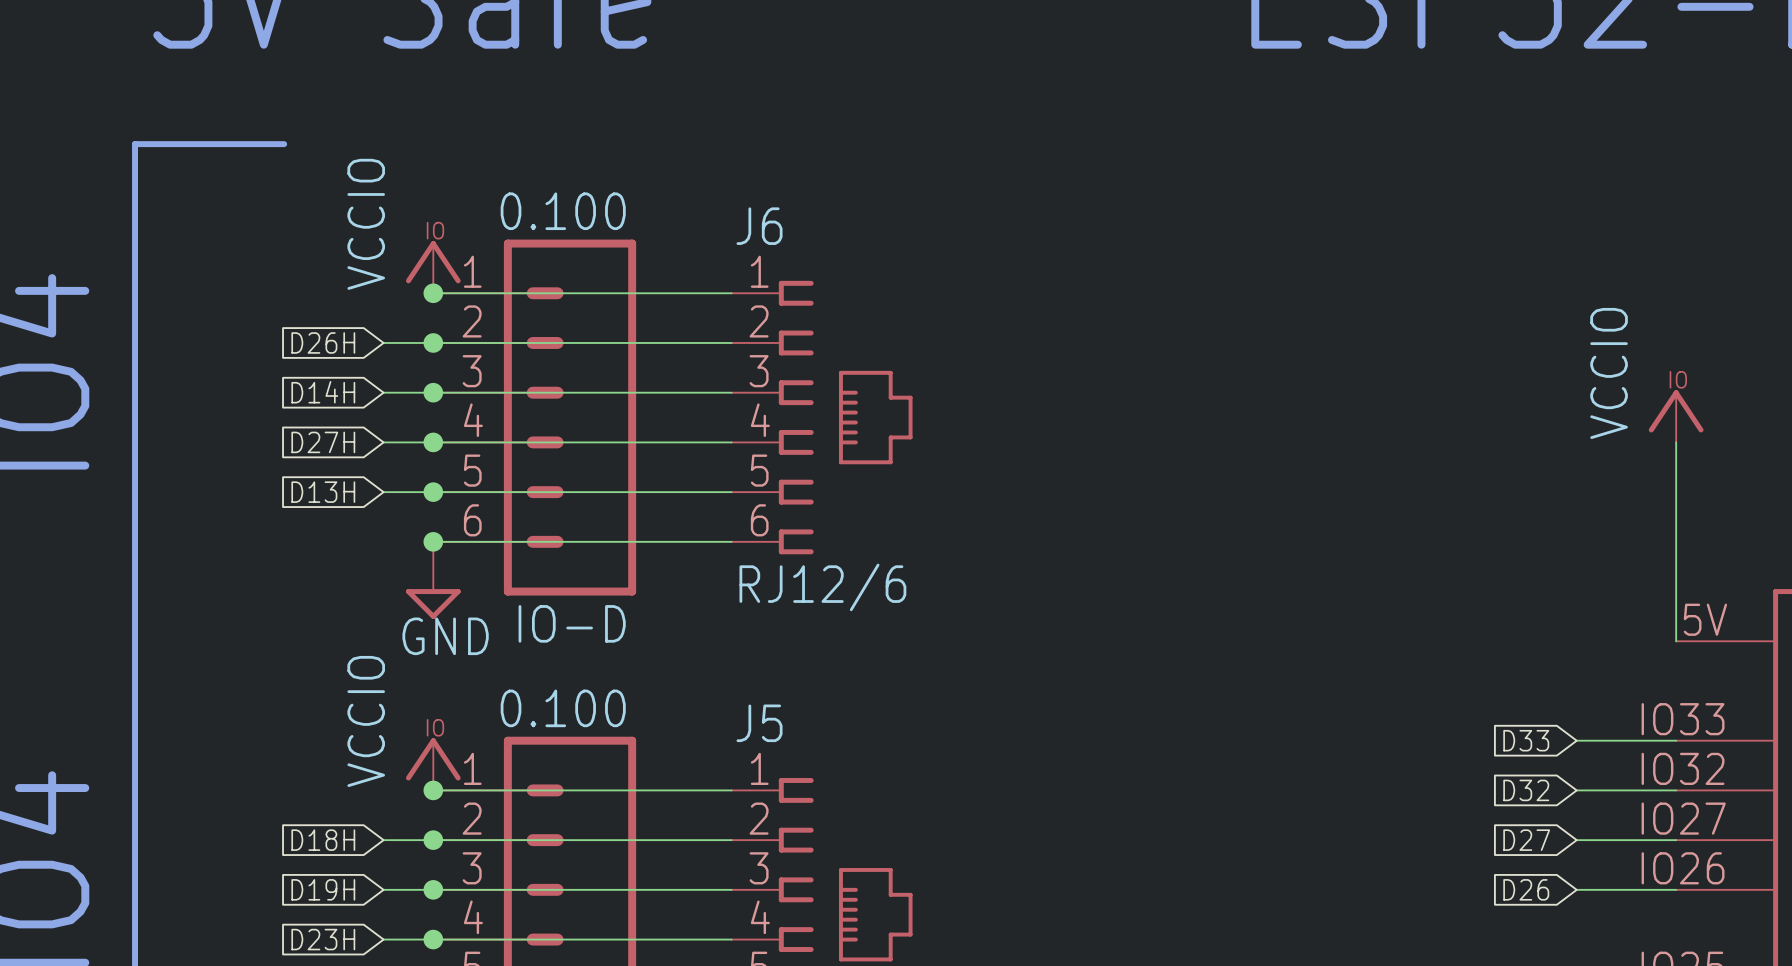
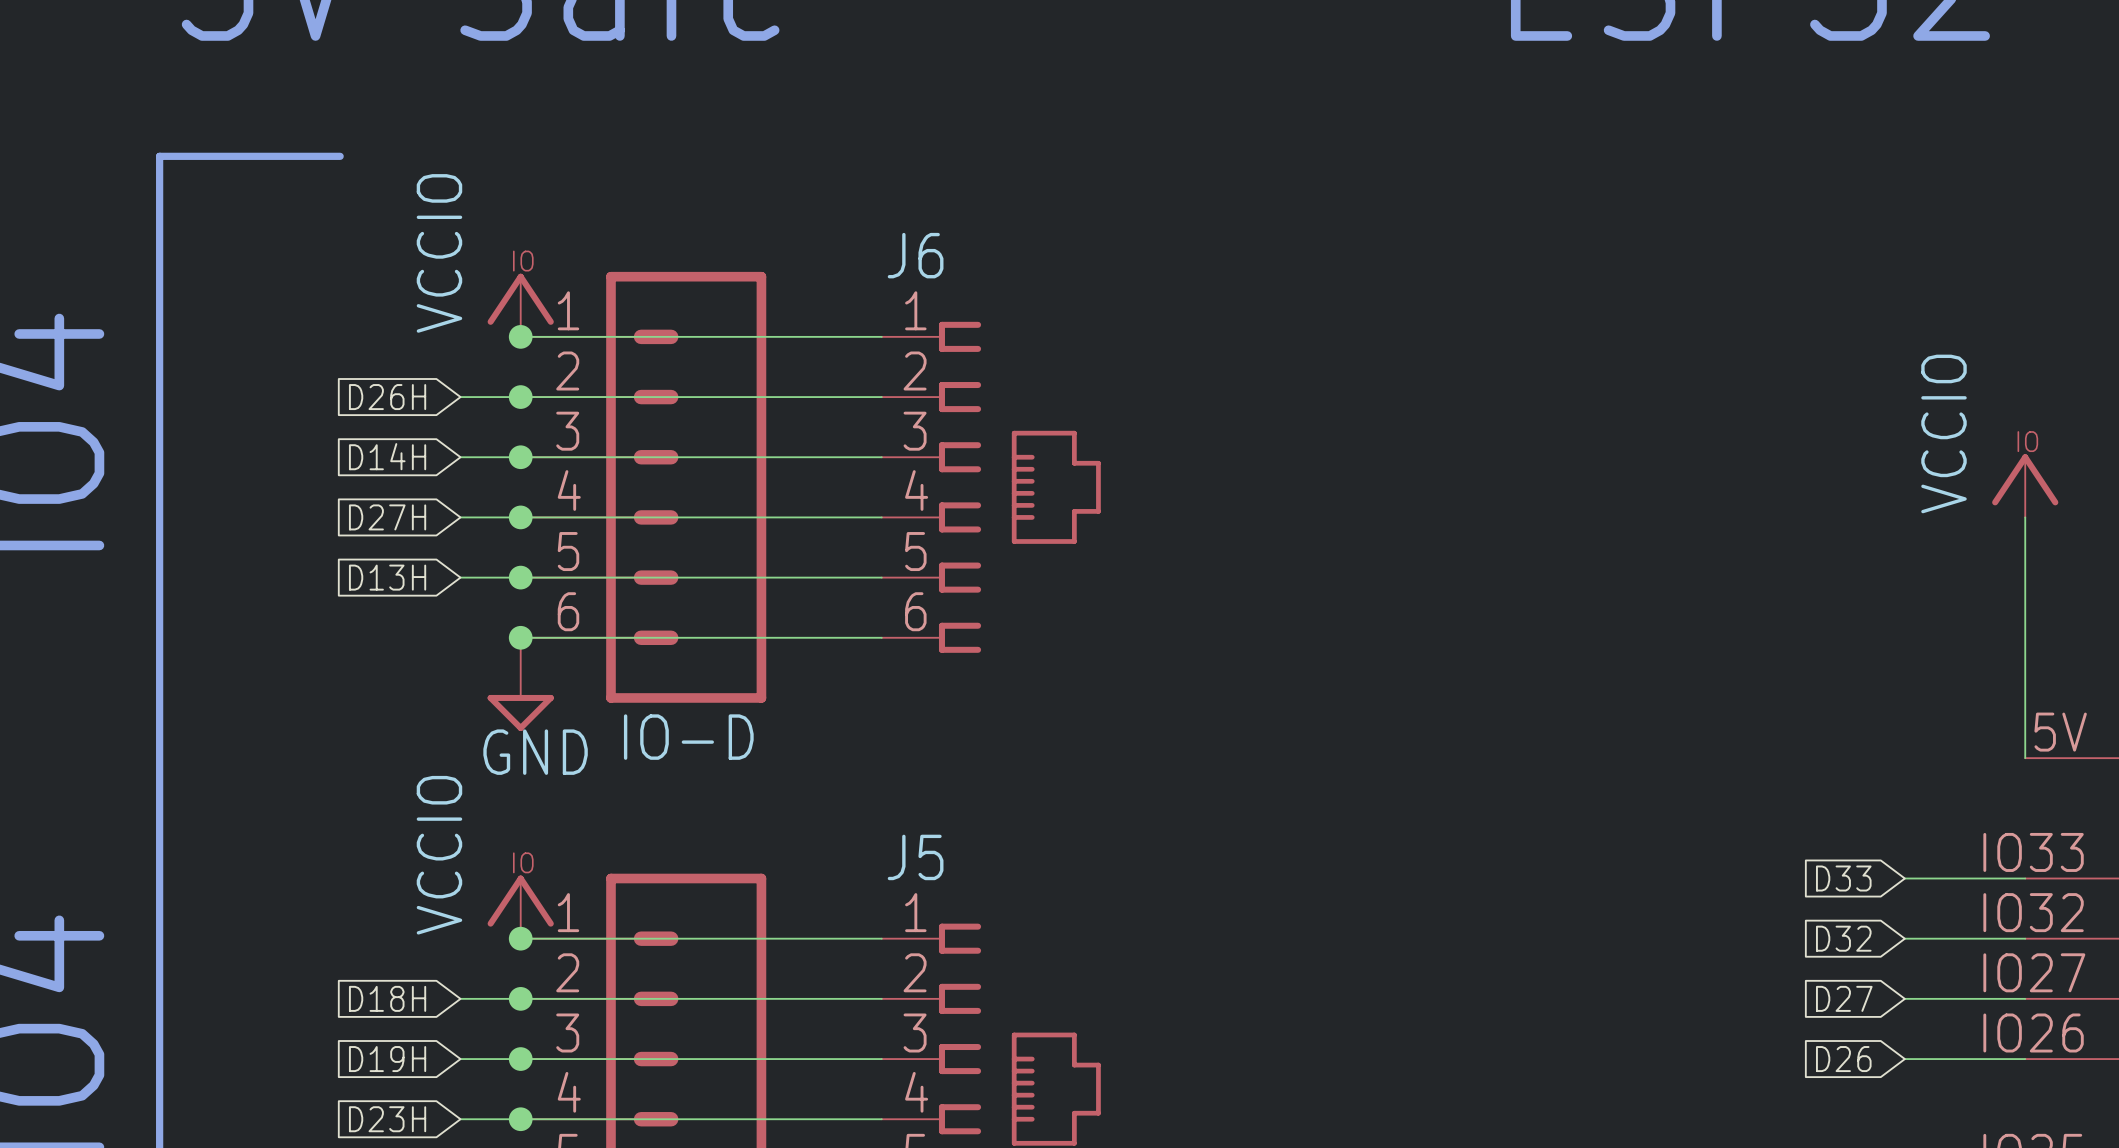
IO-D value: 0.100 (563, 211) -> none
J6 value: RJ12/6 (822, 587) -> none
part value: 0.100 (563, 708) -> none

